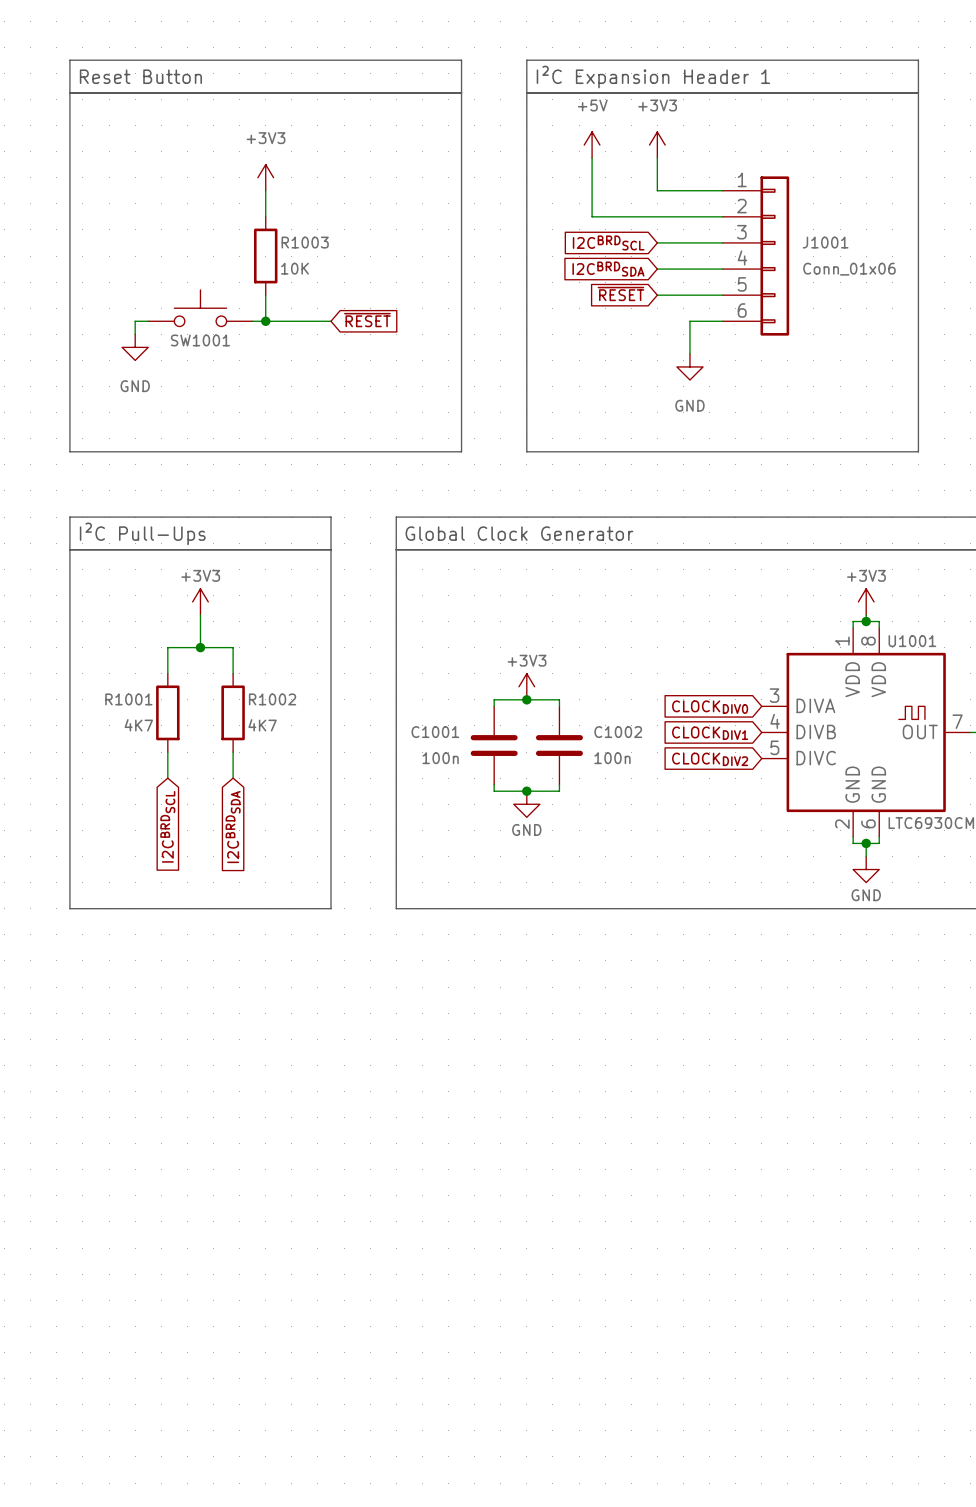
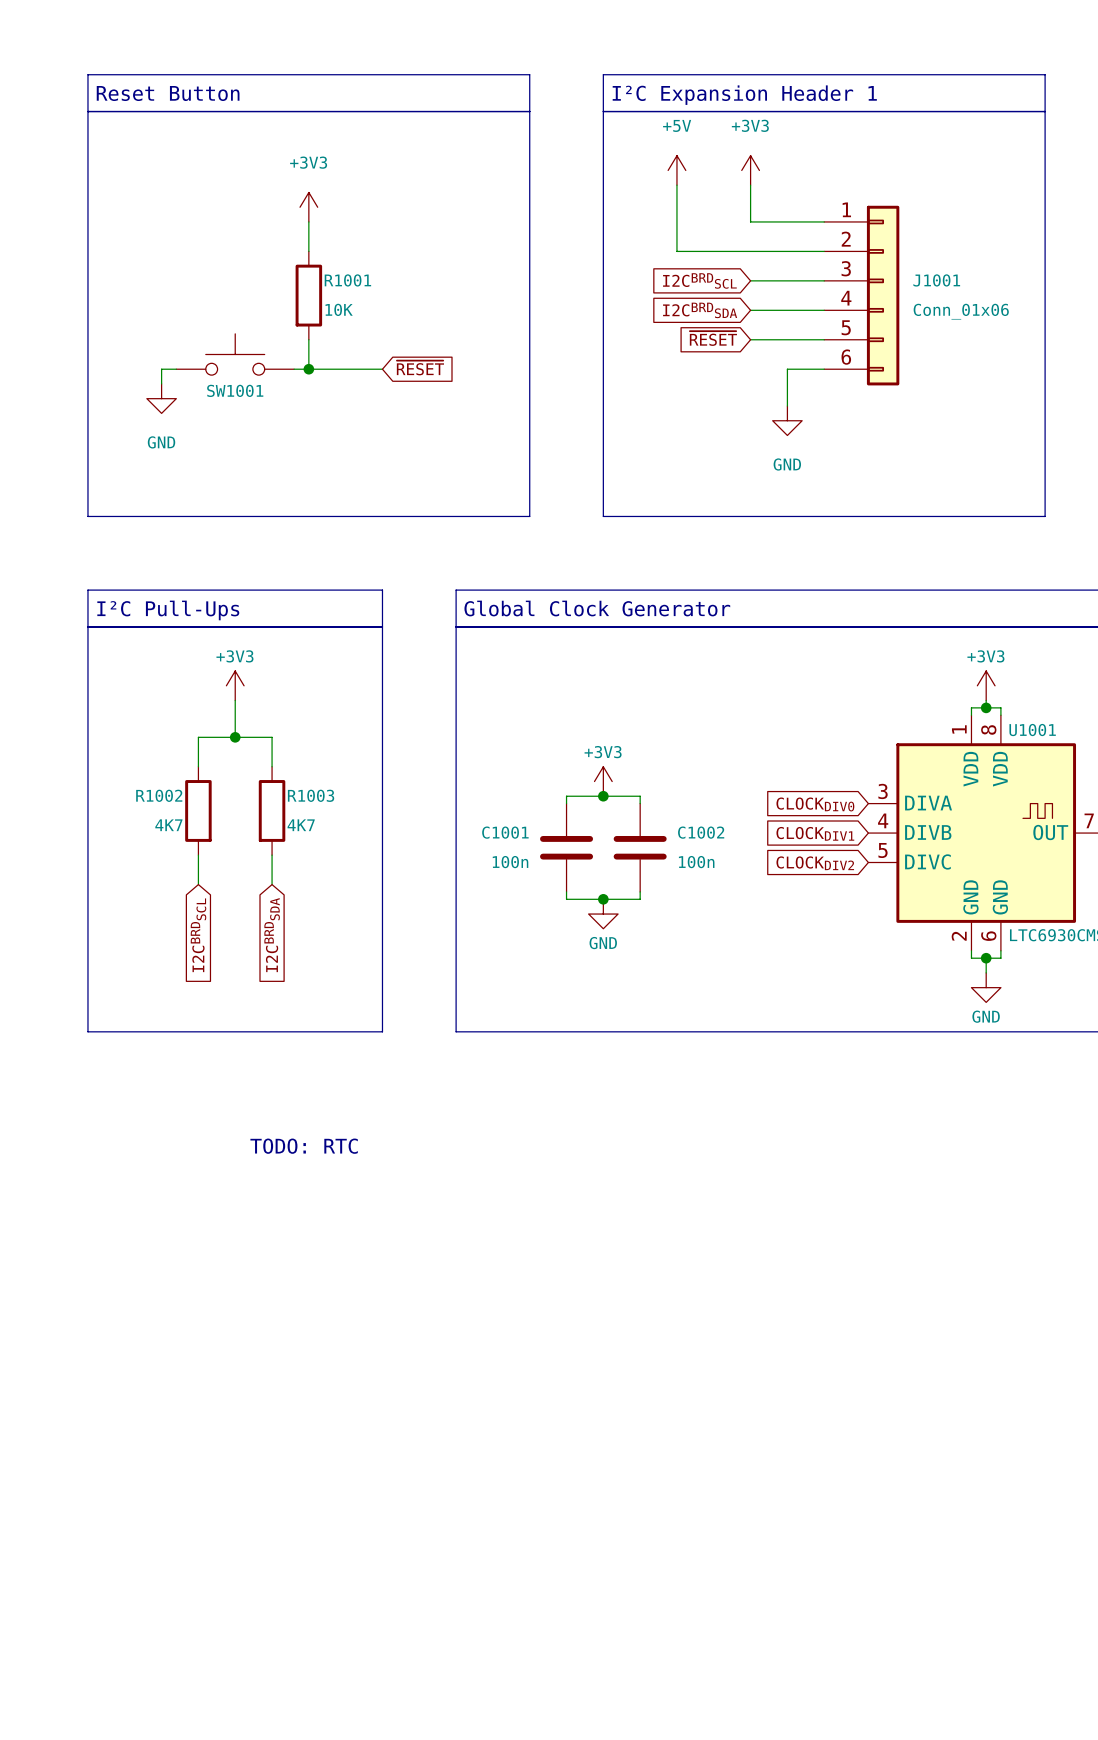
R1003 name: R1003 (305, 242) -> R1001 (347, 280)
R1001 name: R1001 (128, 699) -> R1002 (159, 795)
R1002 name: R1002 (272, 699) -> R1003 (311, 795)
text: none -> TODO: RTC (304, 1146)

